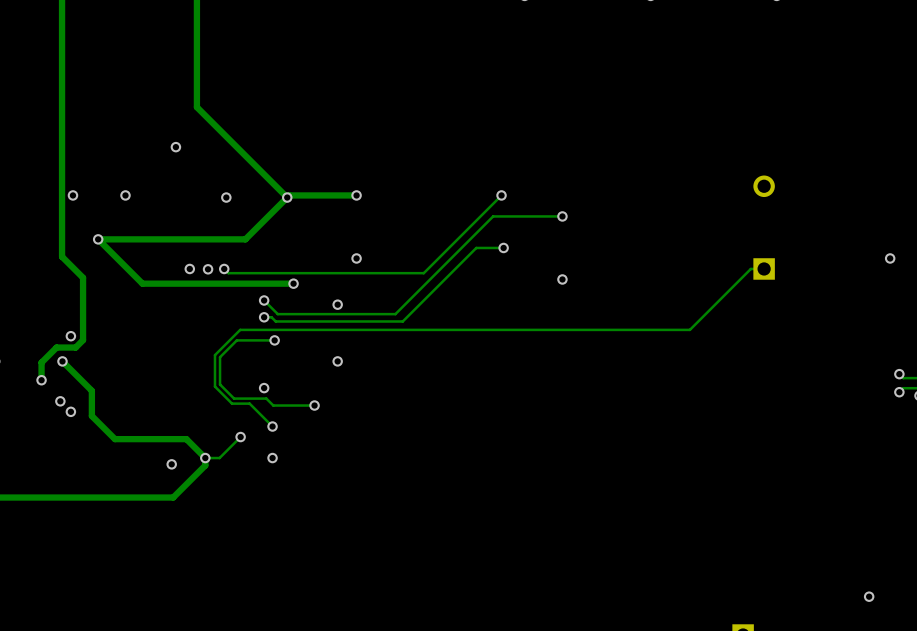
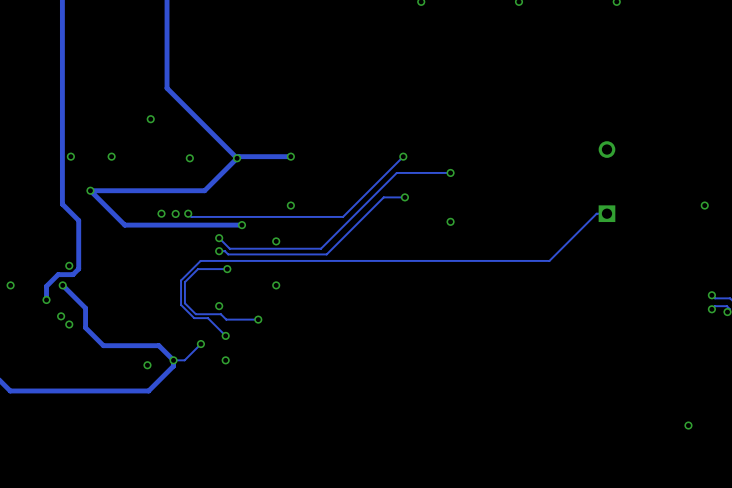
via: none -> (688, 425)
via: (869, 596) -> none

